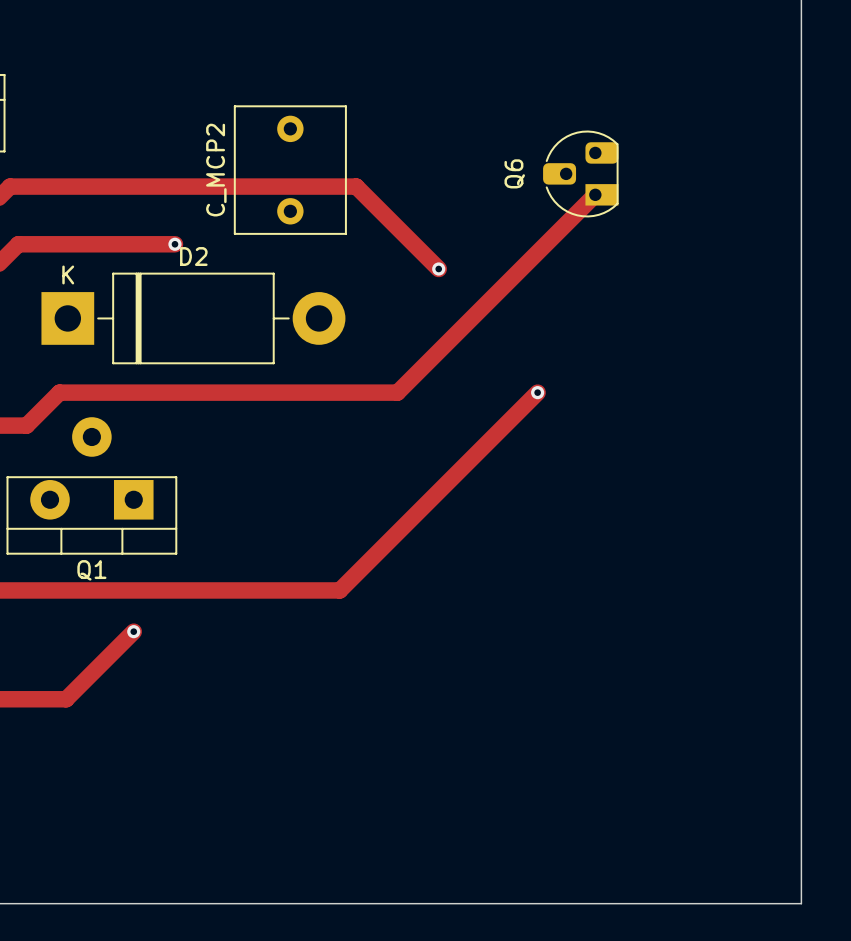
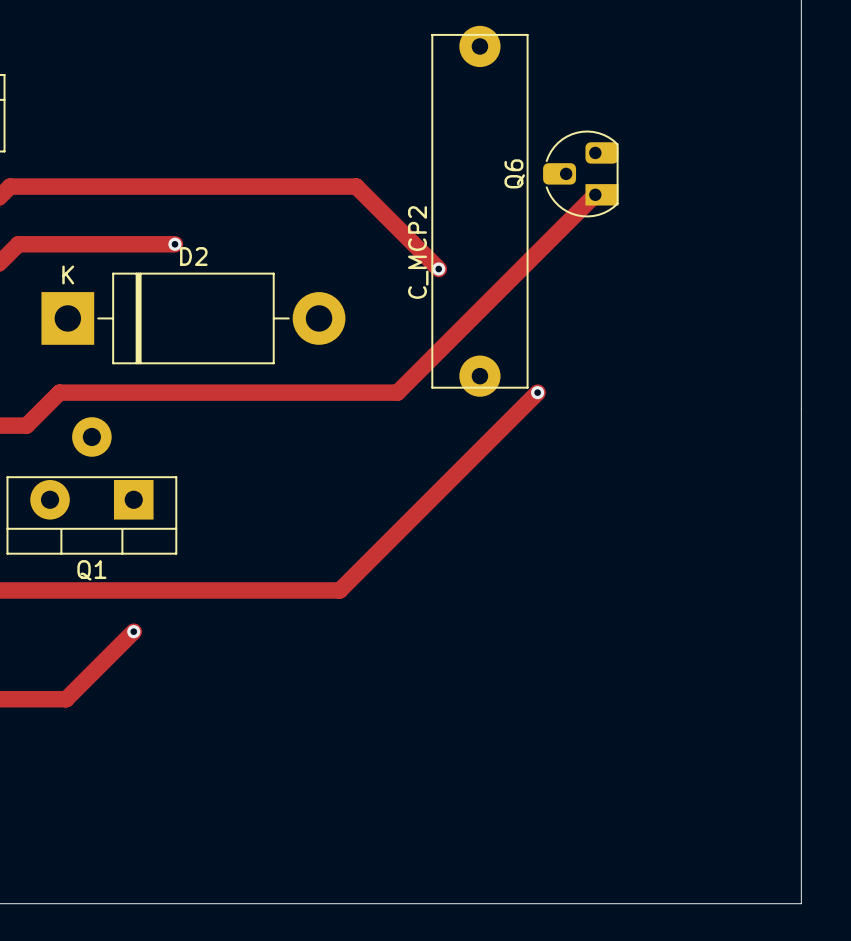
C_MCP2 footprint: [233, 105, 347, 235] -> [431, 25, 529, 397]
C_MCP2 name position: C_MCP2 (216, 170) -> C_MCP2 (418, 252)

